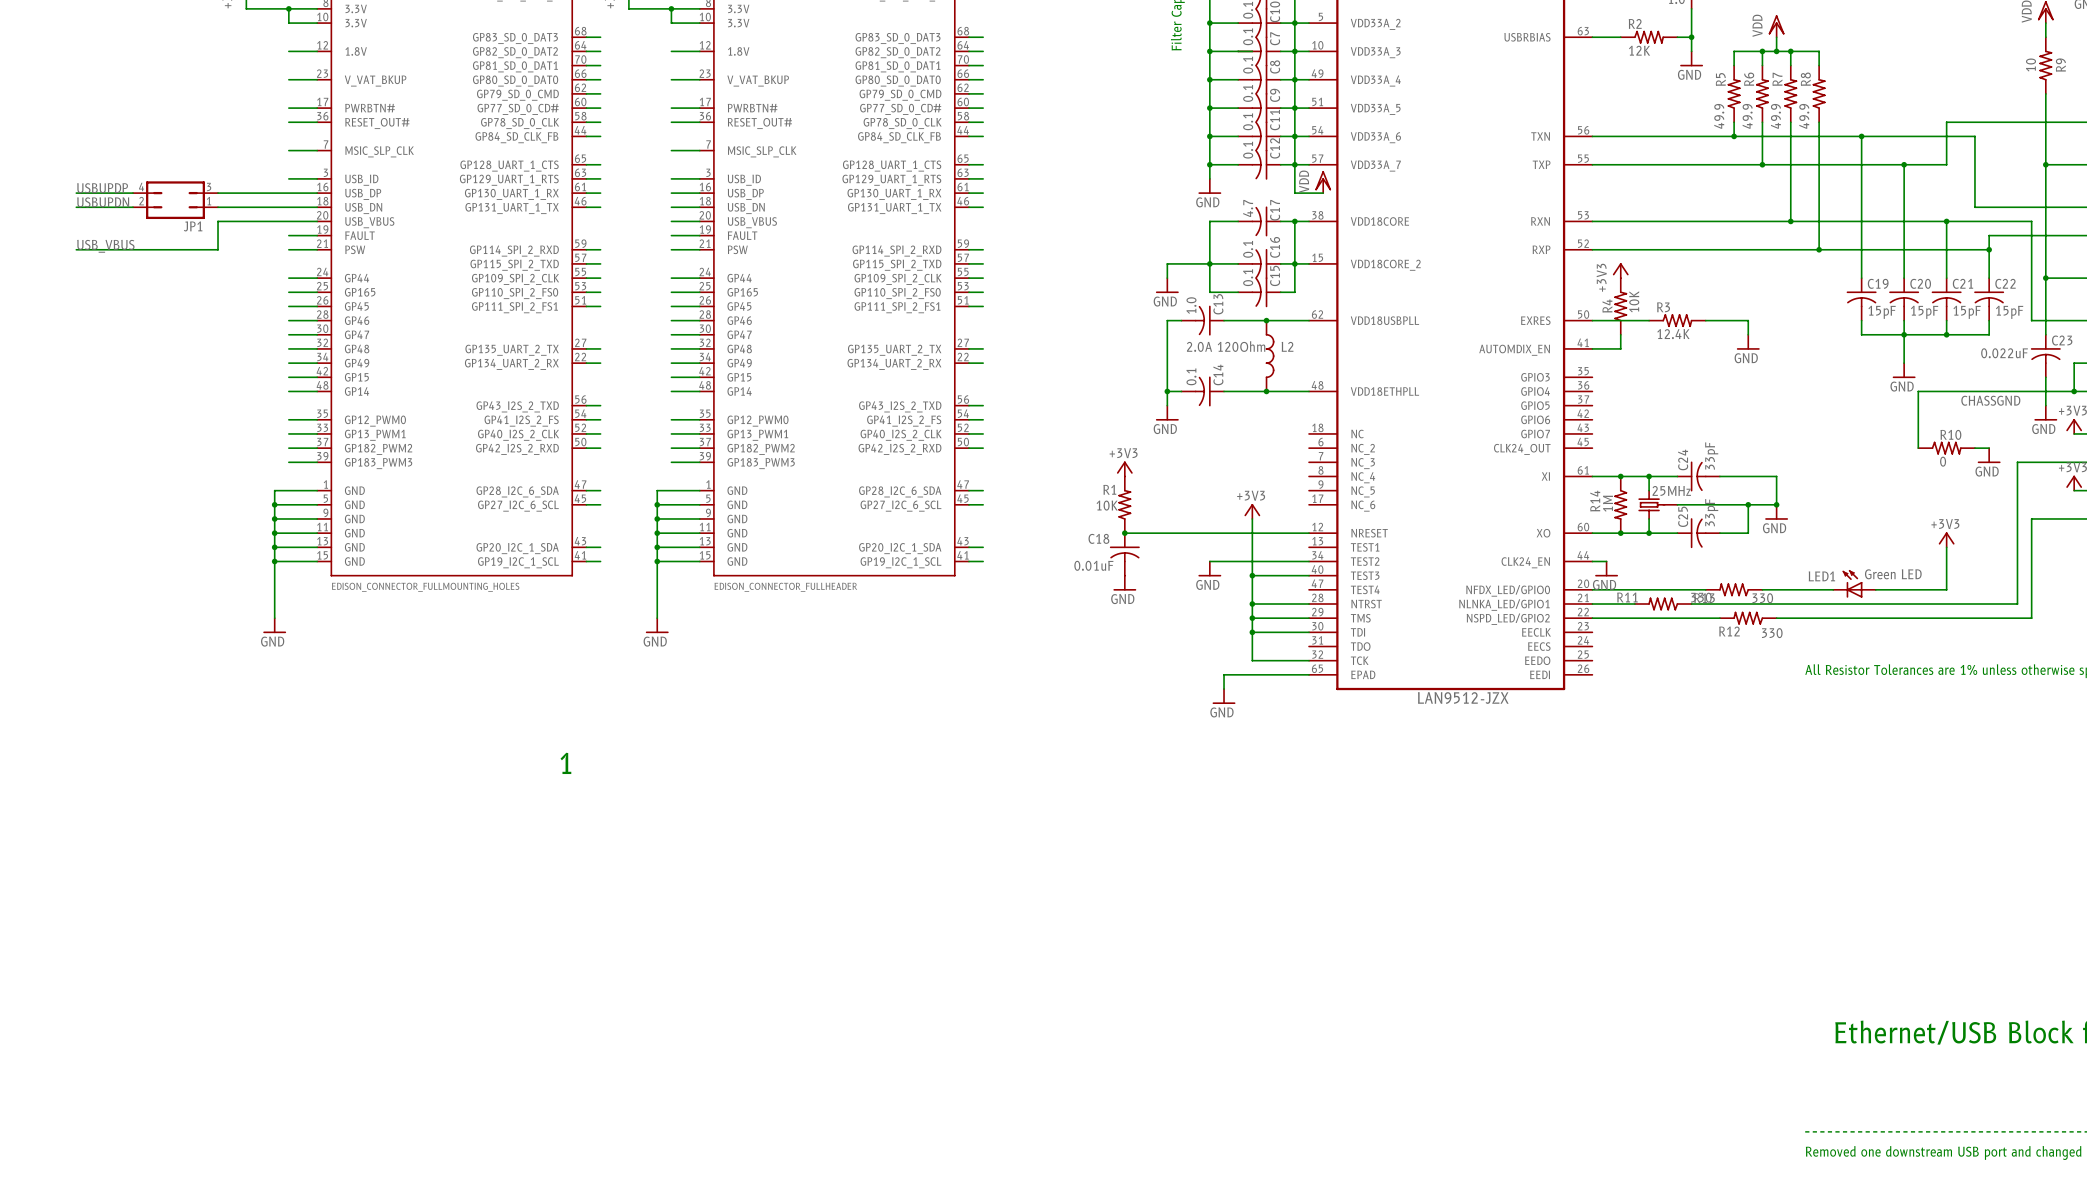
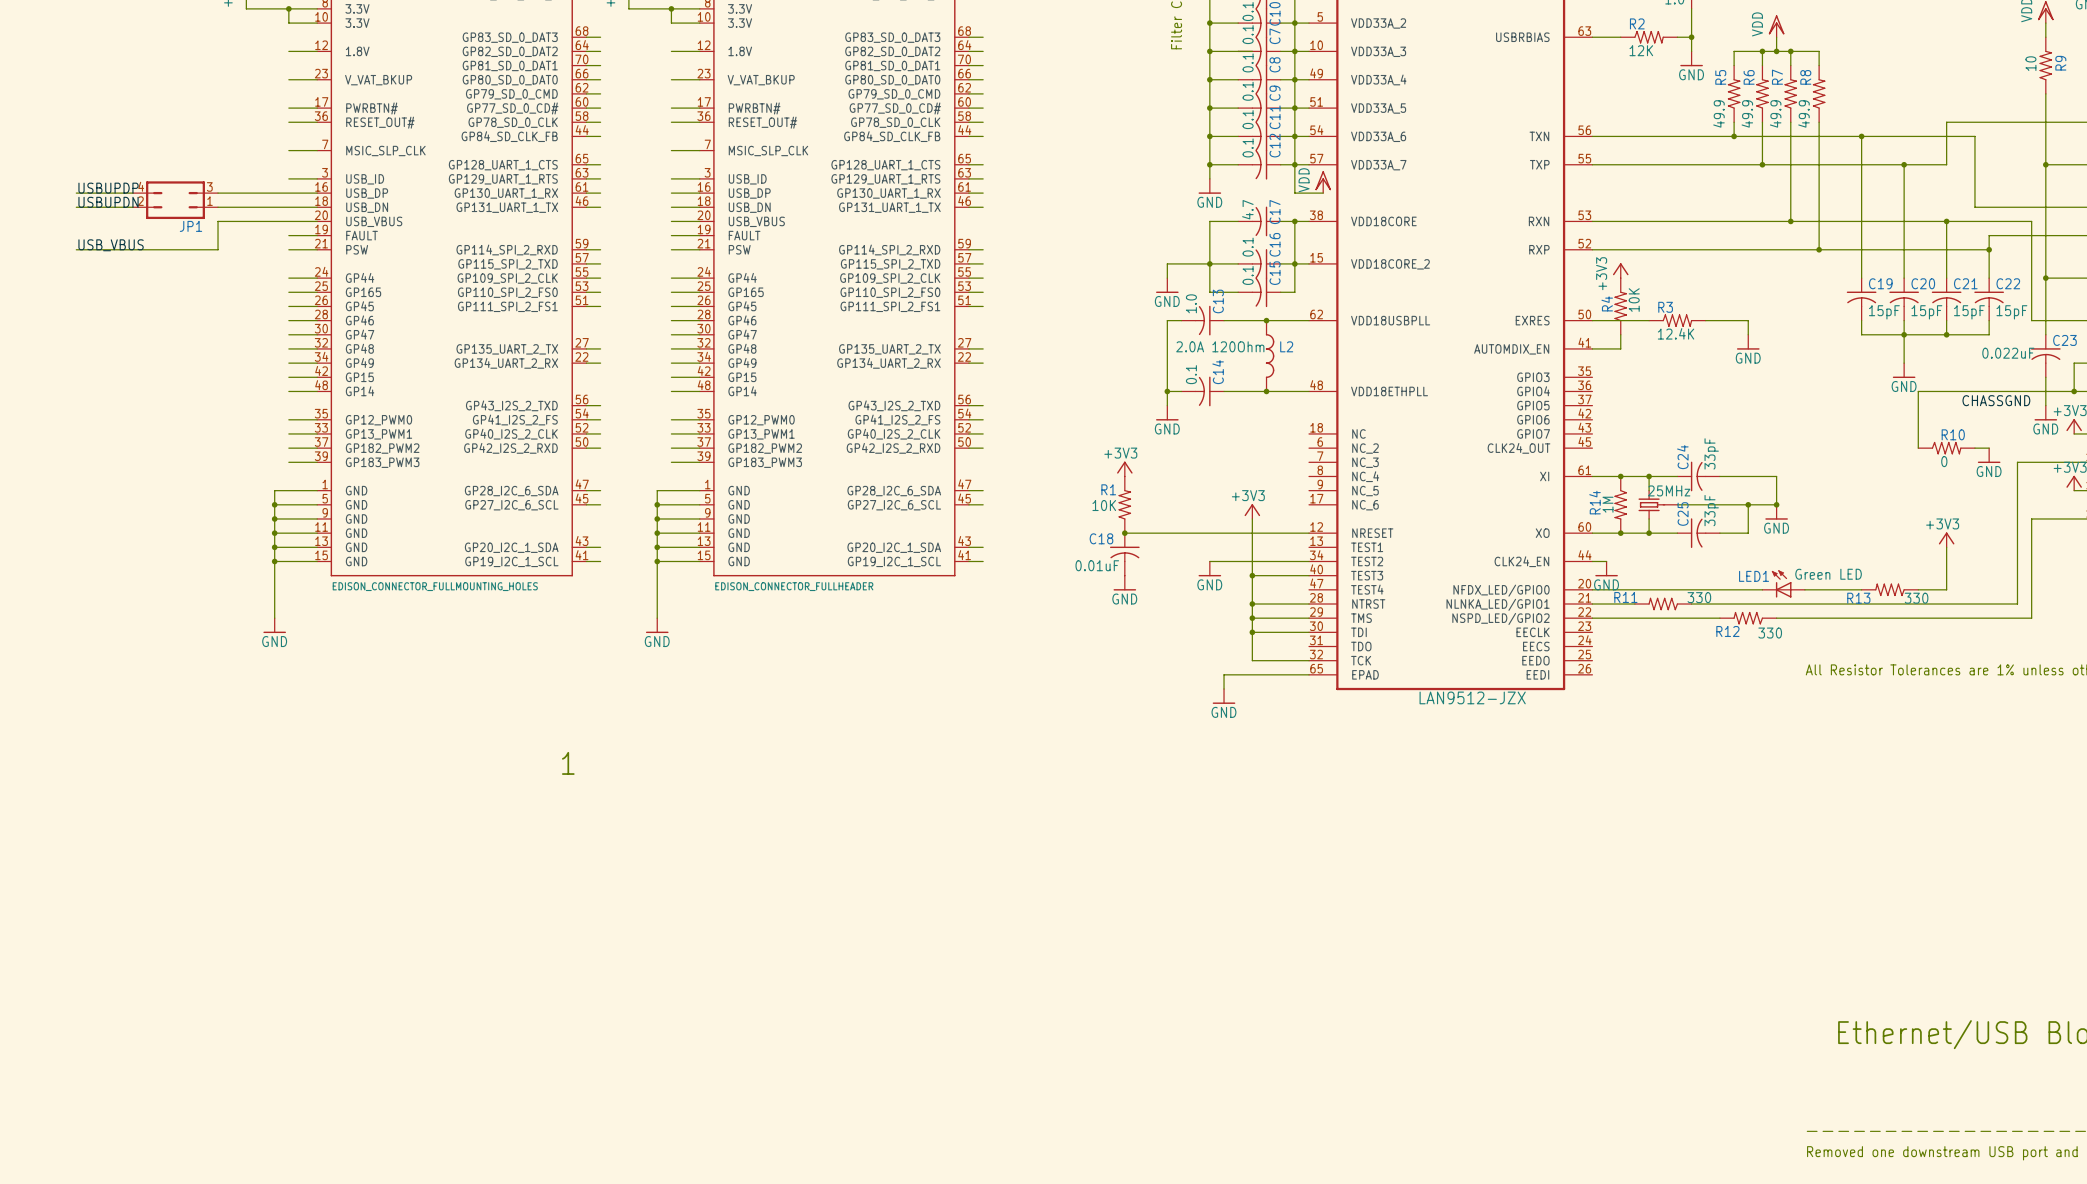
LED1 position: (1854, 583) -> (1783, 583)
R13 position: (1734, 589) -> (1889, 589)

